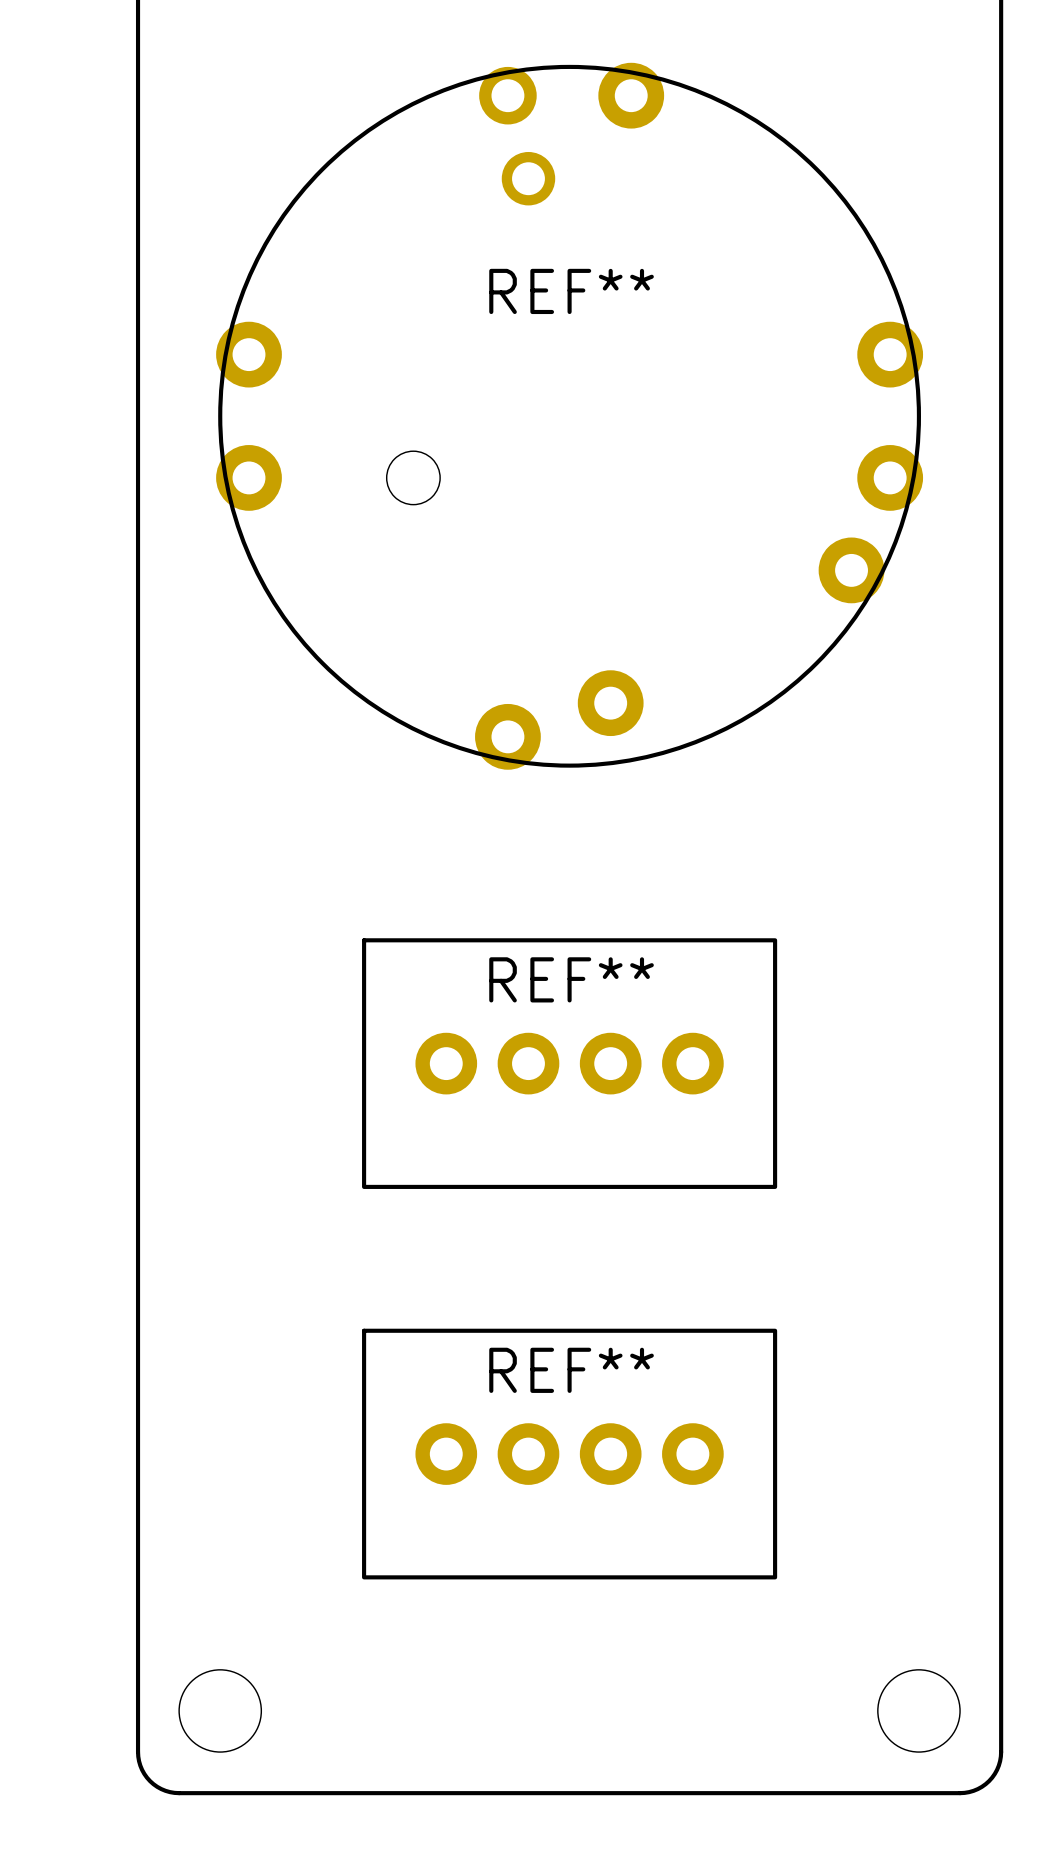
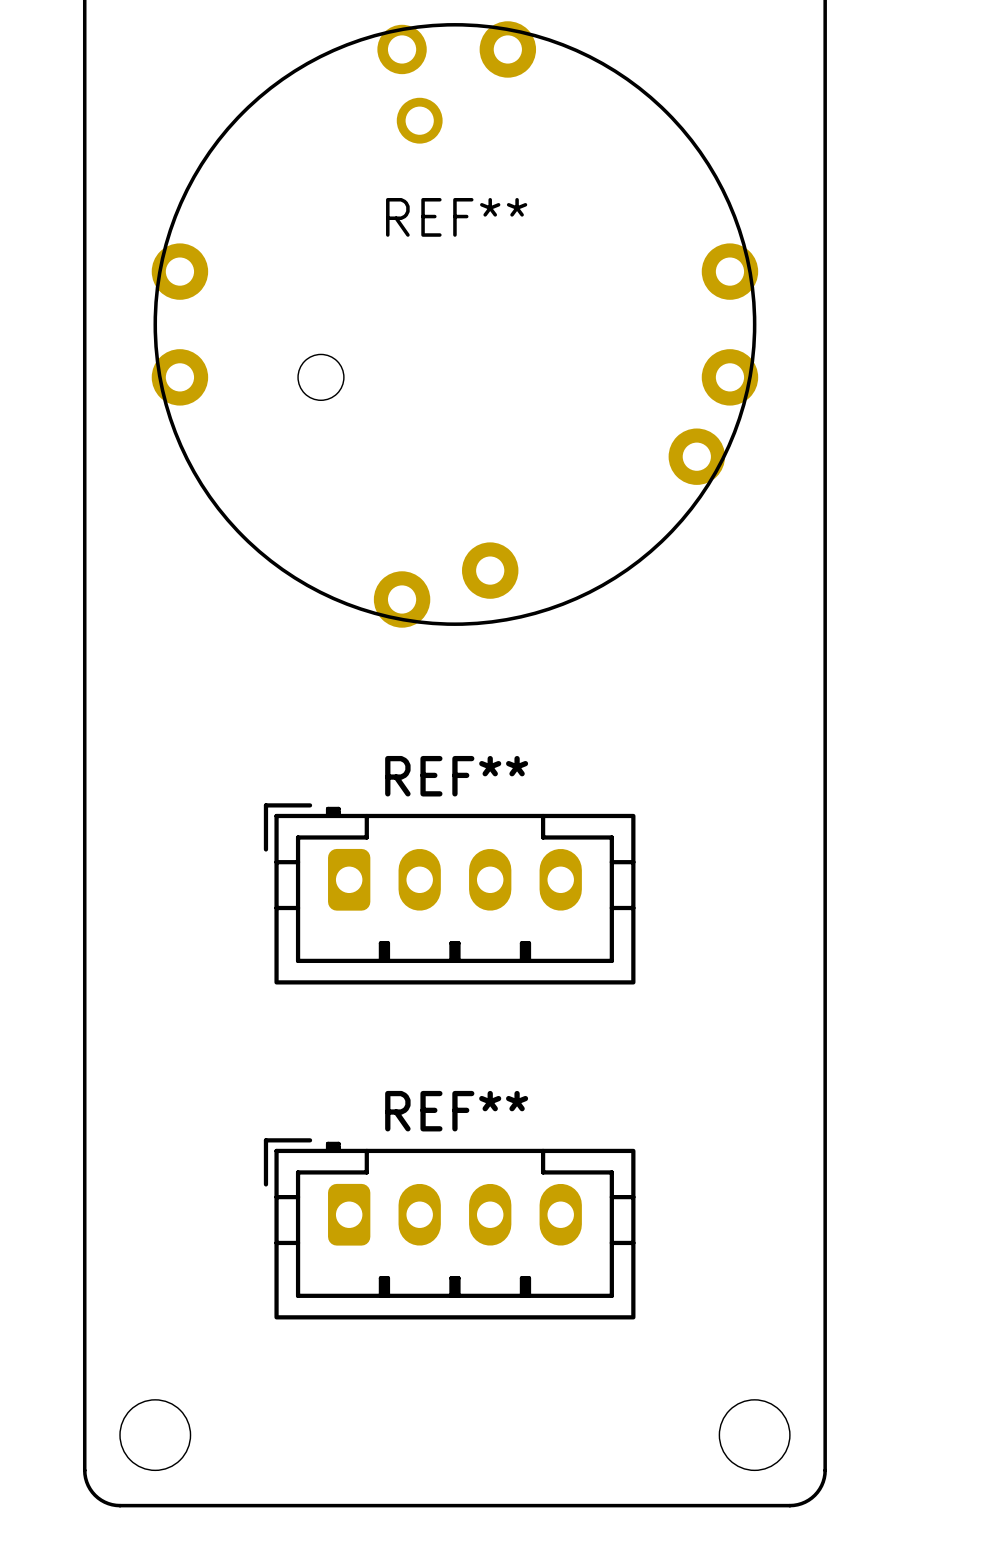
REF** footprint: [362, 938, 778, 1189] -> [263, 803, 636, 985]
REF** footprint: [362, 1328, 778, 1580] -> [263, 1138, 636, 1320]

